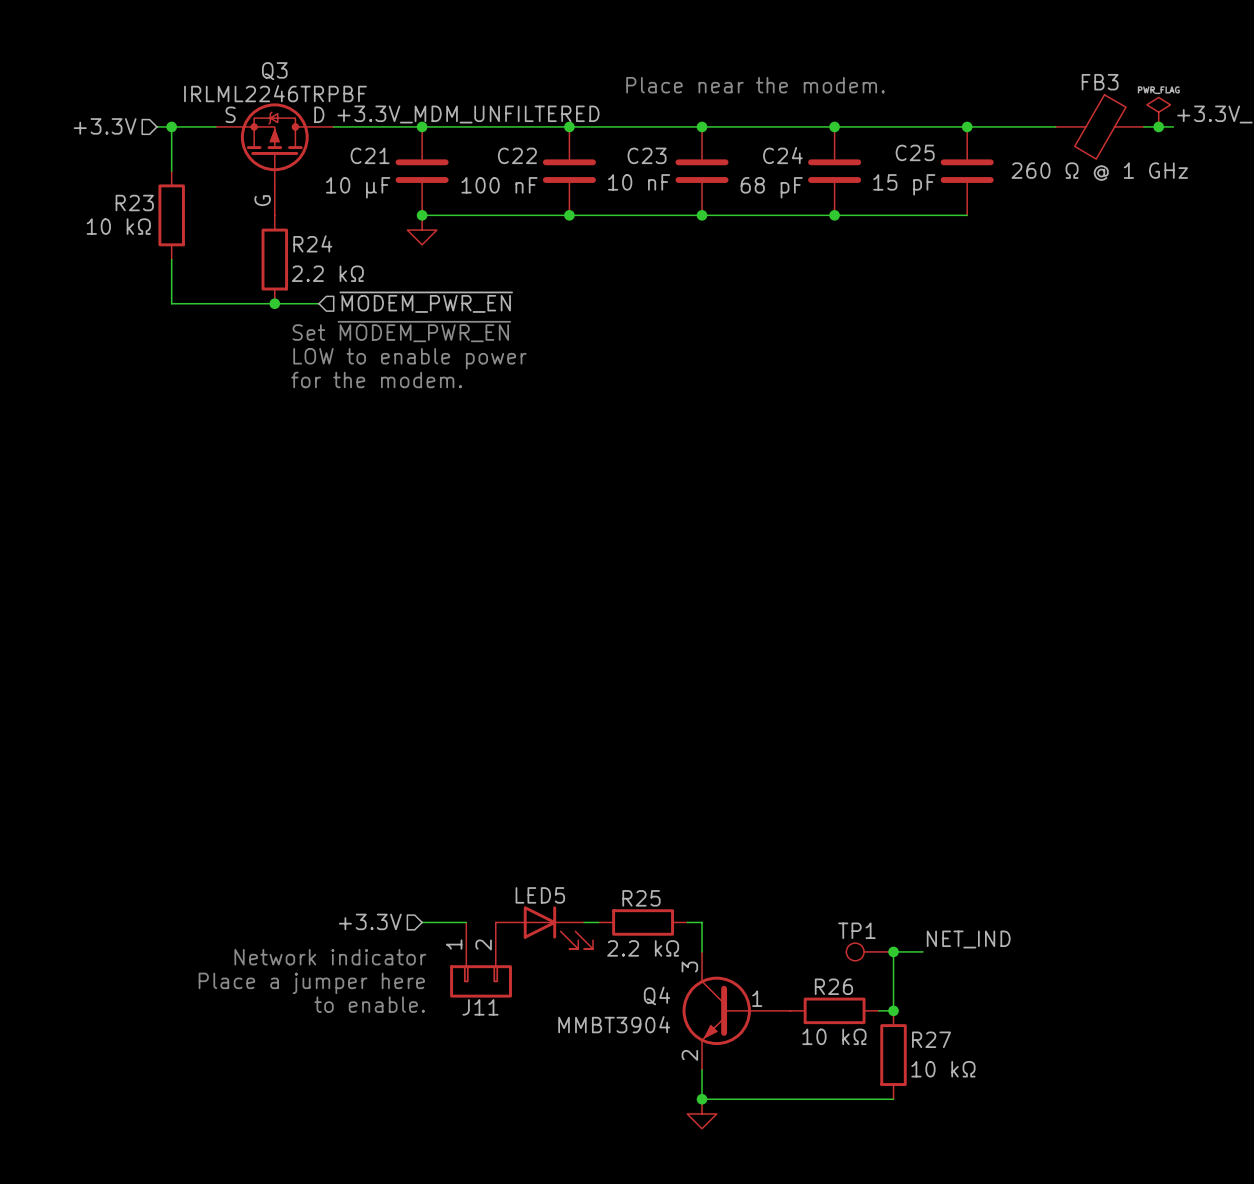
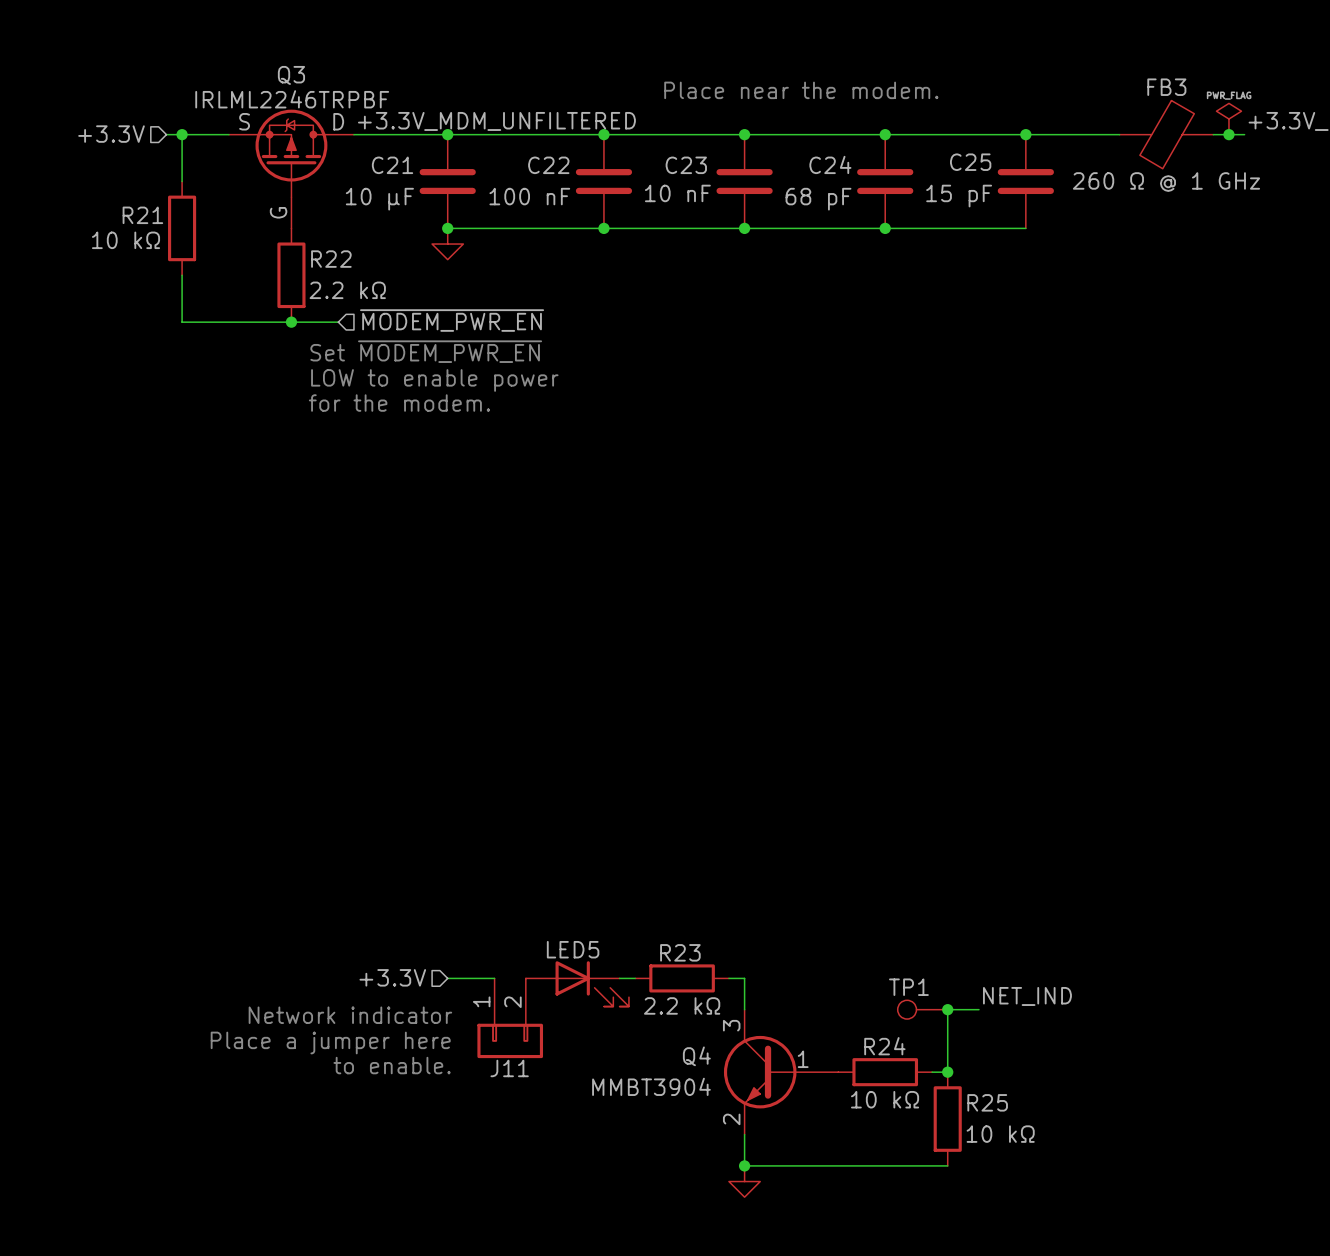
R23 name: R23 (134, 203) -> R21 (142, 215)
R24 name: R24 (312, 243) -> R22 (331, 259)
R25 name: R25 (641, 898) -> R23 (680, 952)
R26 name: R26 (833, 986) -> R24 (884, 1046)
R27 name: R27 (931, 1039) -> R25 (987, 1102)

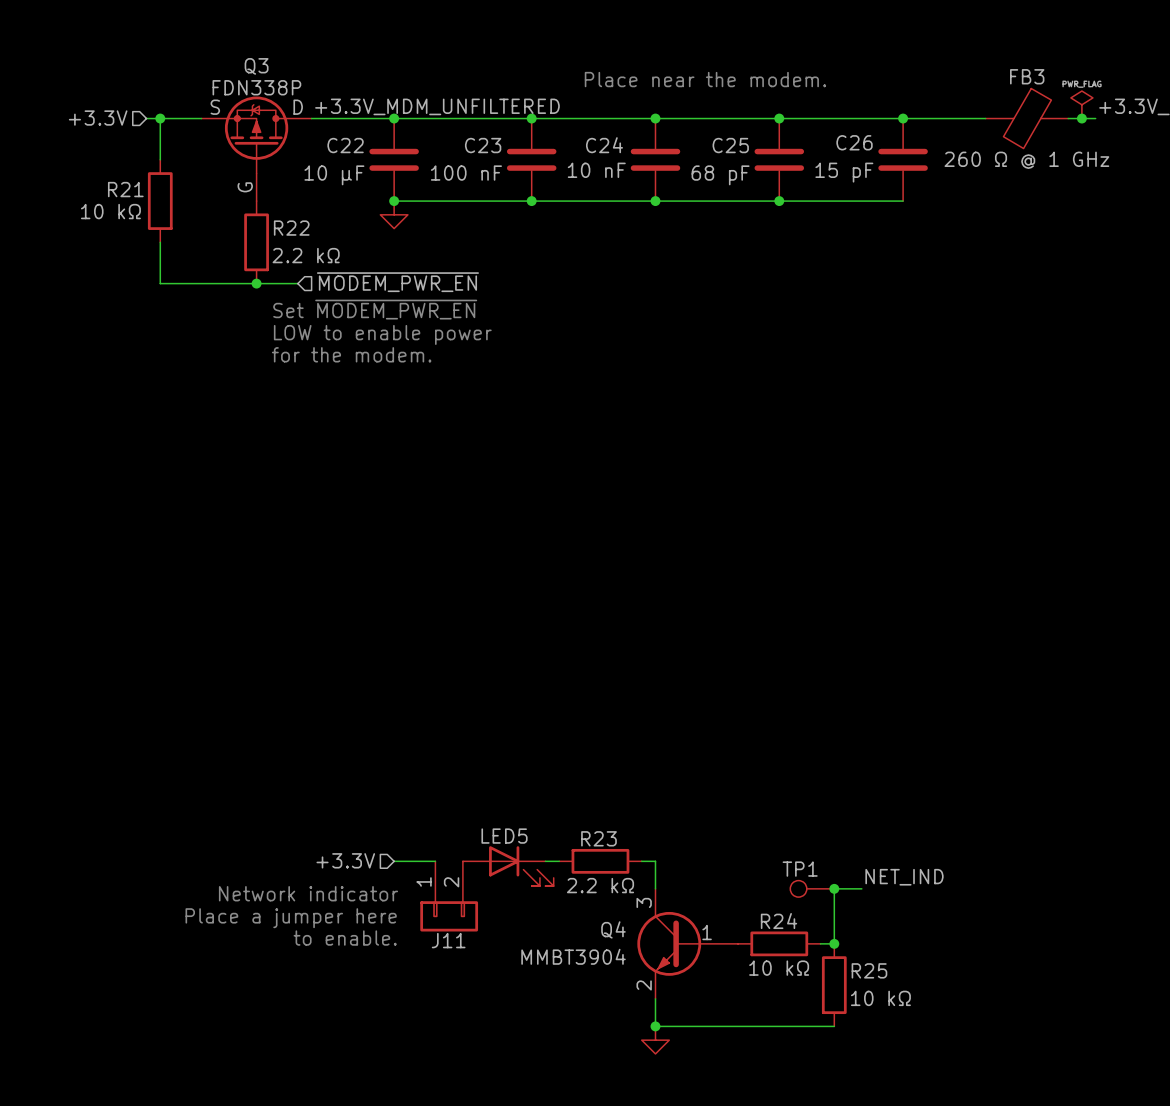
Q3 value: IRLML2246TRPBF (292, 99) -> FDN338P (256, 87)
C25 name: C25 (970, 162) -> C26 (854, 142)
C24 name: C24 (830, 164) -> C25 (730, 145)
C21 name: C21 (392, 165) -> C22 (345, 145)
C22 name: C22 (548, 165) -> C23 (483, 145)
C23 name: C23 (686, 165) -> C24 (604, 145)

